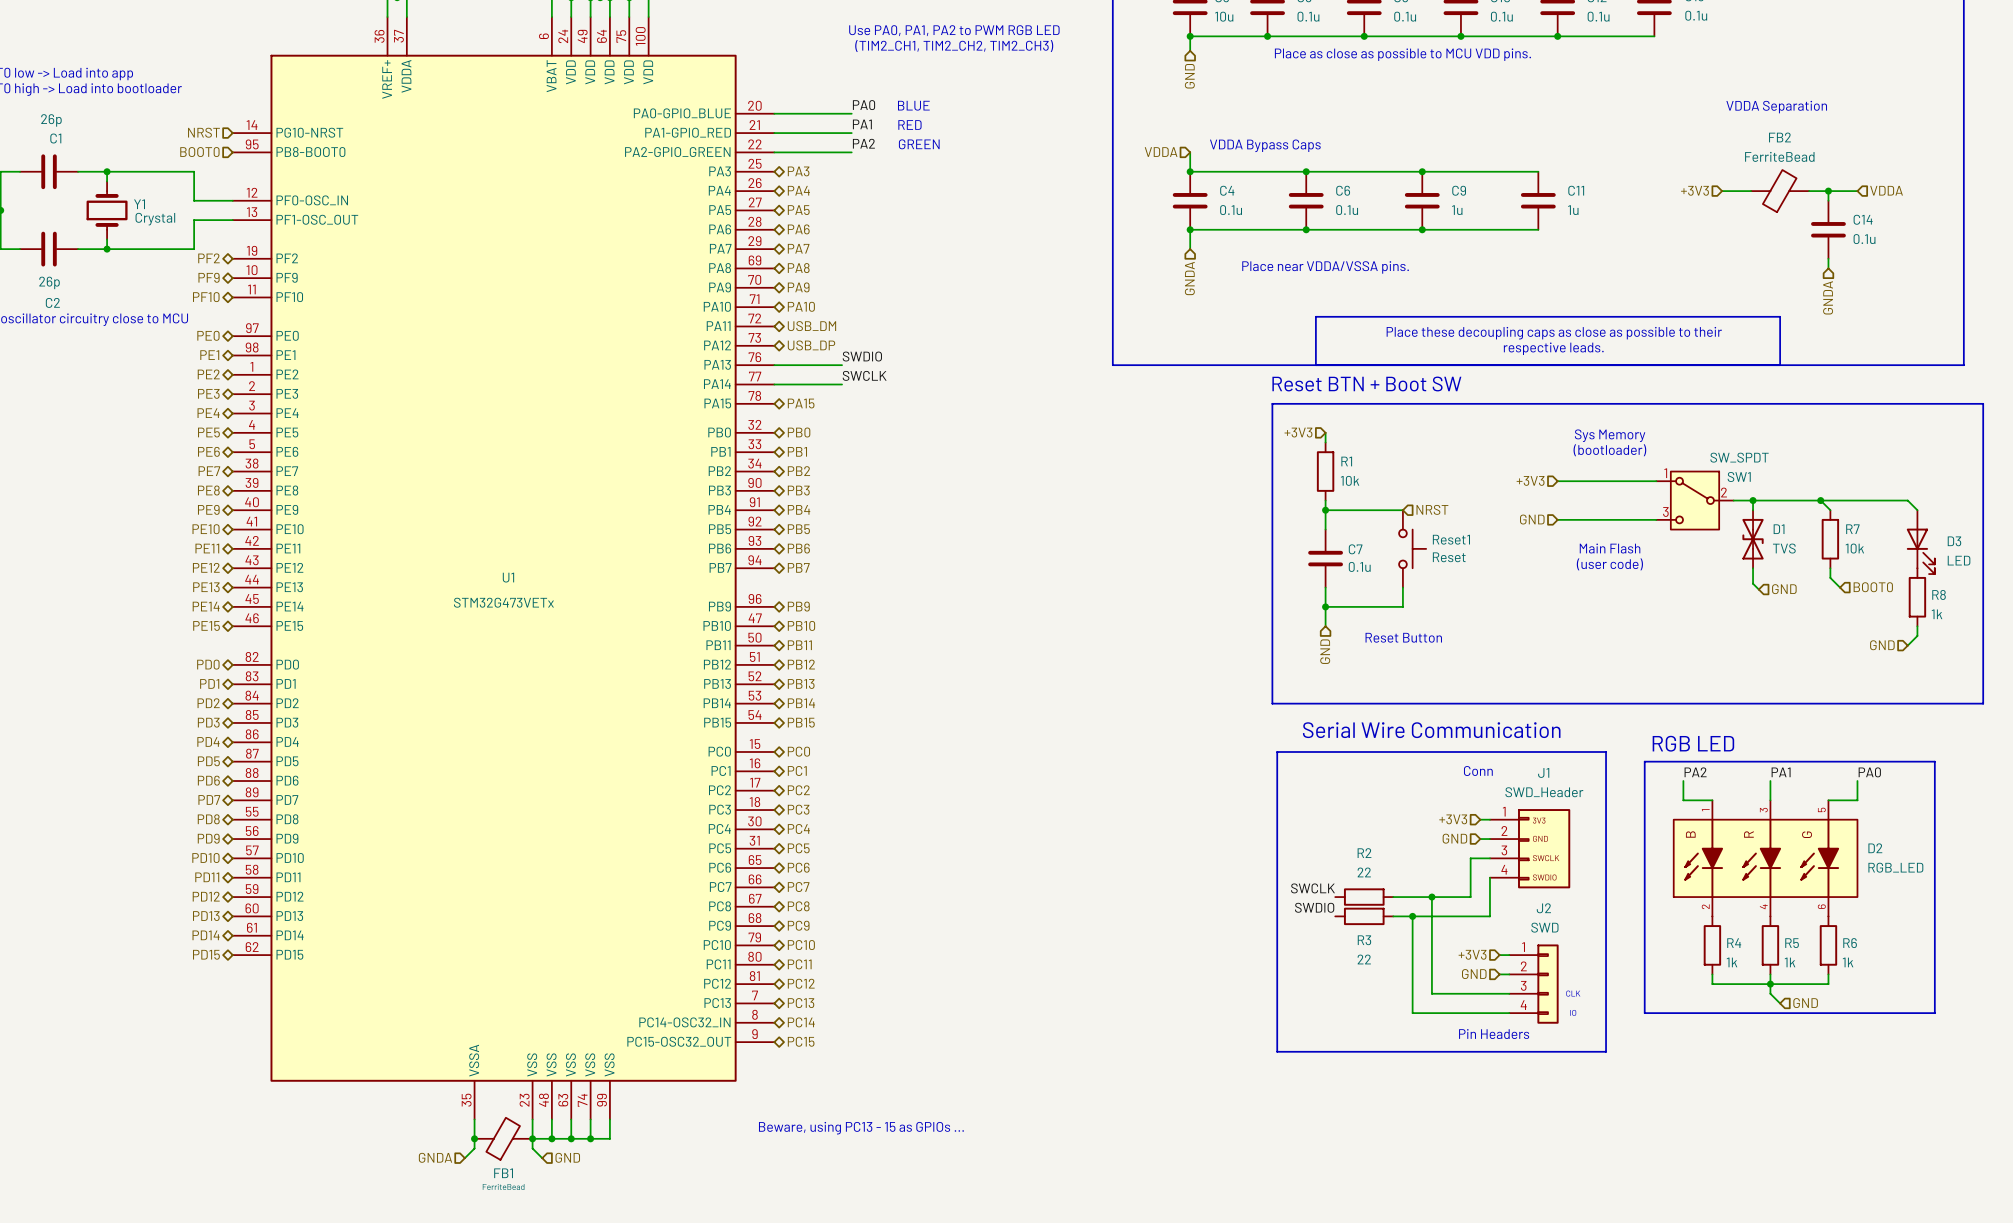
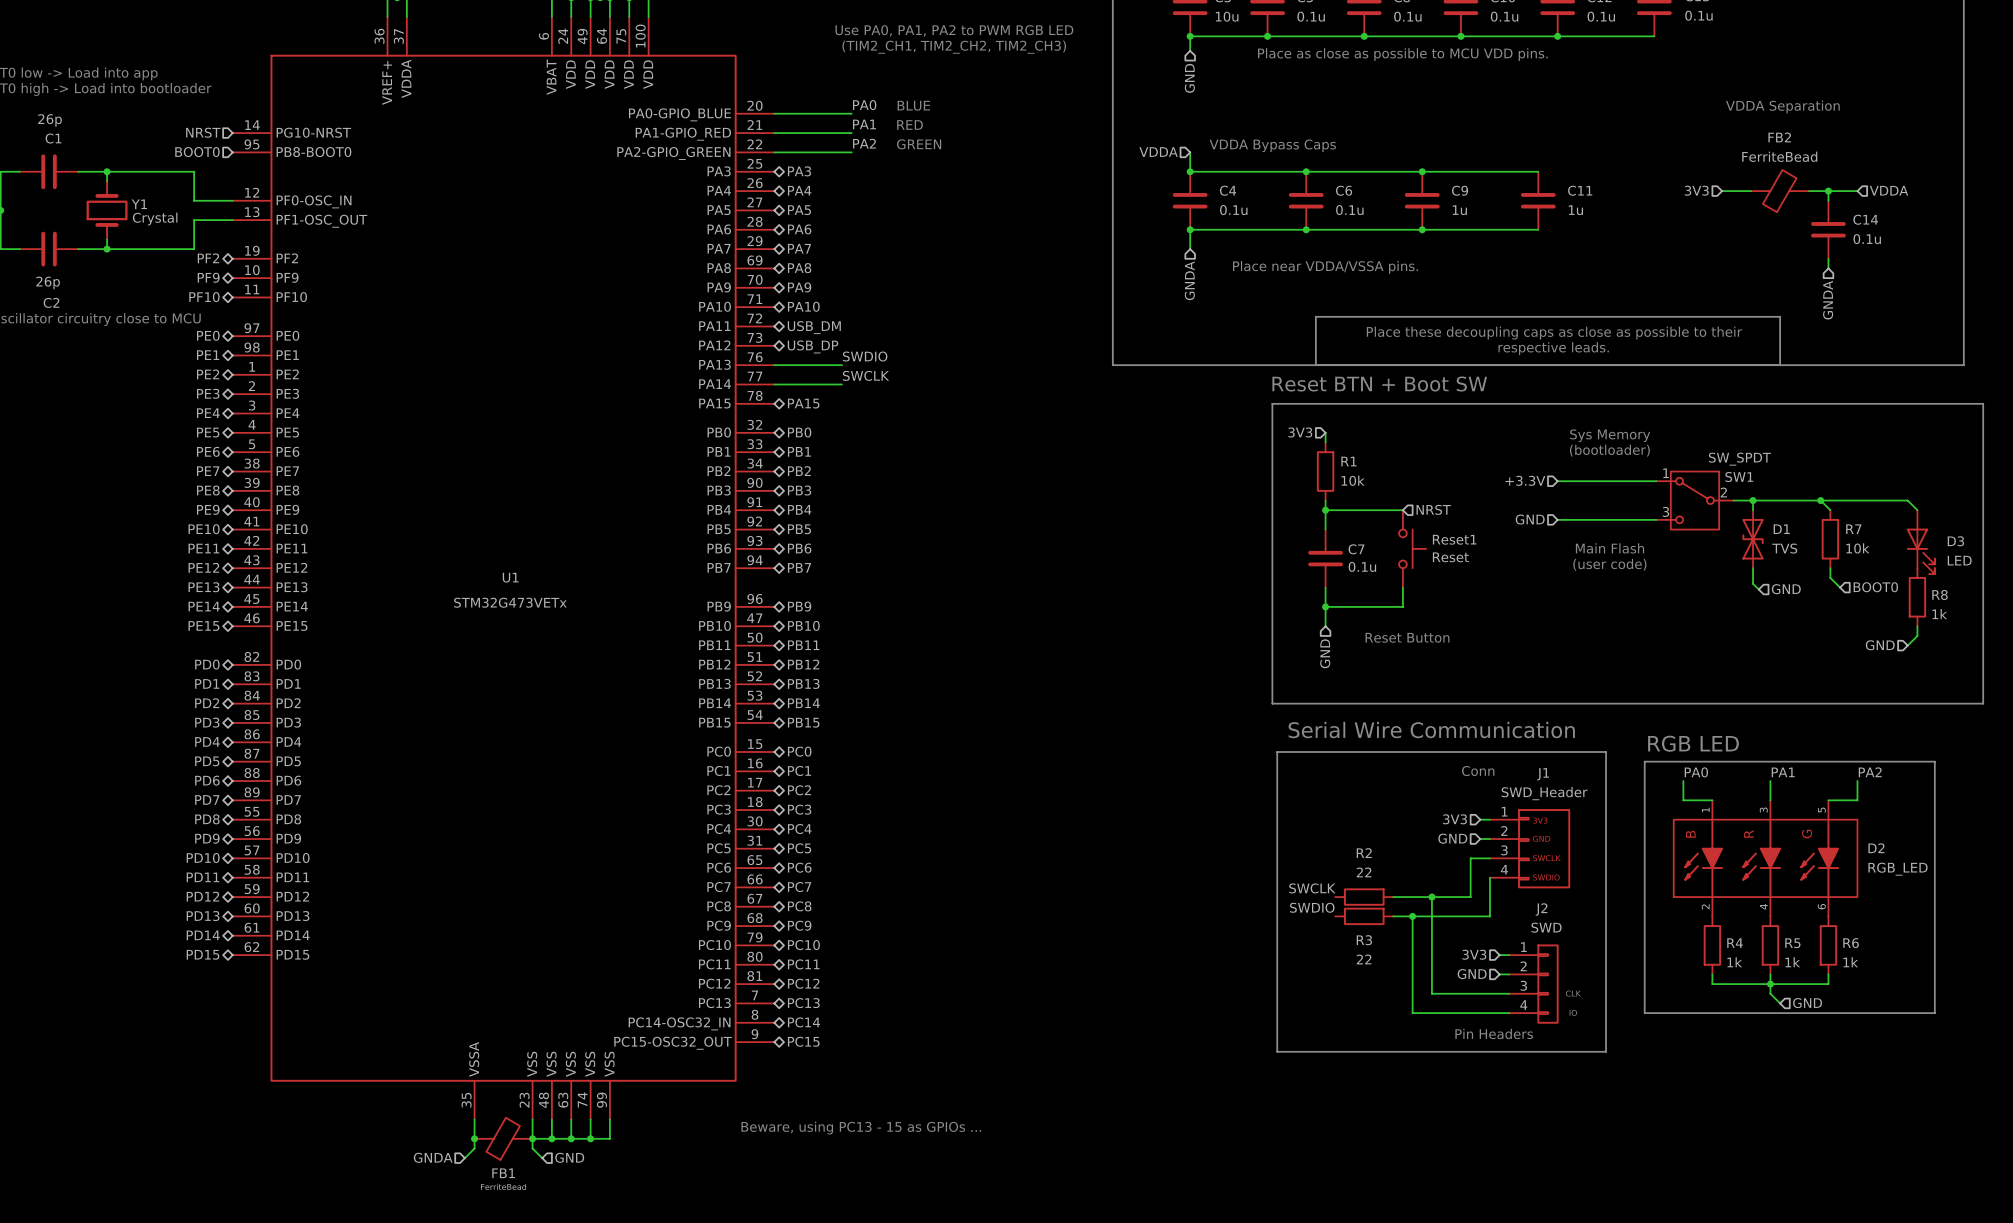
hierarchical label: +3V3 (1694, 190) -> 3V3 (1696, 190)
hierarchical label: +3V3 (1298, 432) -> 3V3 (1300, 432)
hierarchical label: +3V3 (1530, 480) -> +3.3V (1525, 480)
label: PA2 (1695, 772) -> PA0 (1696, 772)
label: PA0 (1869, 772) -> PA2 (1870, 772)
hierarchical label: +3V3 (1453, 819) -> 3V3 (1455, 819)
hierarchical label: +3V3 (1472, 954) -> 3V3 (1474, 954)

